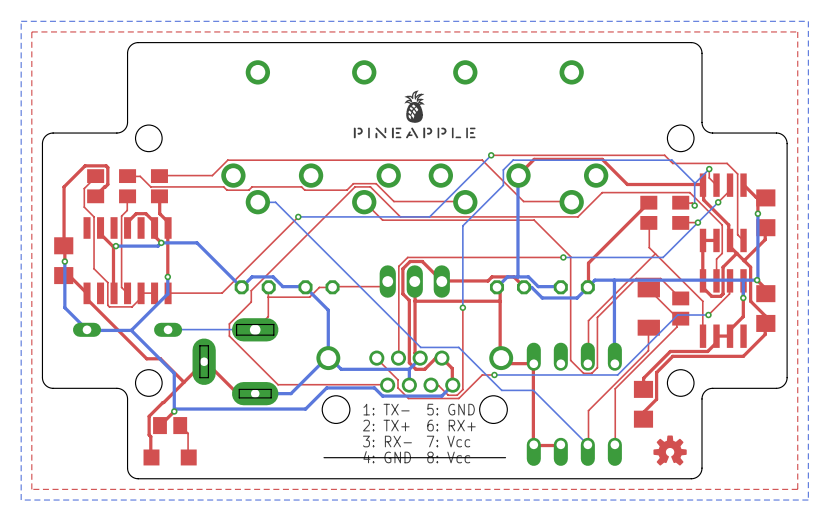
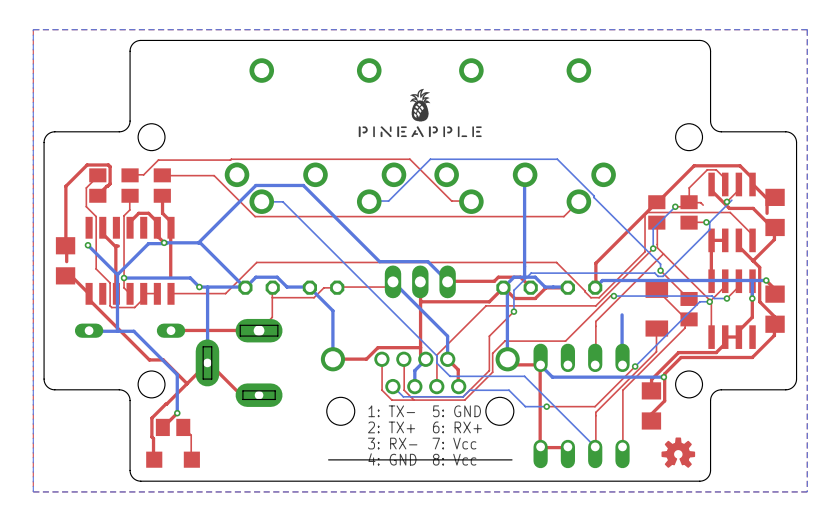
bottom zone outline: (808, 21) (21, 21) (21, 500) (808, 500) (808, 21) -> (807, 29) (807, 491) (33, 491) (33, 29) (807, 29)
top track: (491, 155) (664, 155) (672, 163) (727, 163) (737, 173) (737, 234) (743, 240) -> (256, 262) (556, 262) (590, 297) (599, 297) (645, 251) (645, 214) (647, 212) (730, 212) (752, 234) (752, 240)
bottom track: (491, 155) (429, 216) (298, 216) -> none
via: (491, 155) -> none
top track: (226, 160) (212, 175) (159, 176) -> (230, 160) (158, 160) (143, 174) (130, 175)
top track: (404, 160) (482, 160) (523, 201) (571, 202) -> (409, 159) (451, 201)
bottom track: (513, 160) (503, 169) (503, 185) (462, 225) (462, 307) -> (519, 159) (430, 159) (388, 201) (369, 201)
bottom track: (550, 160) (671, 160) (695, 183) -> (557, 159) (660, 264) (660, 270)
top track: (709, 169) (709, 178) (715, 184) -> (675, 206) (684, 206) (689, 202) (689, 187) (707, 169) (716, 169) (724, 178) (724, 183)
bottom track: (709, 169) (694, 183) (694, 205) -> none
via: (709, 169) -> none
top track: (518, 175) (534, 159) (602, 159) (627, 184) (703, 185) -> none
top track: (127, 176) (140, 176) (150, 186) (223, 186) (226, 190) (248, 190) (252, 186) (301, 186) (304, 190) (346, 190) (353, 183) (376, 183) (393, 201) (445, 201) -> none
top track: none -> (752, 184) (752, 178) (740, 165) (694, 165) (656, 202)
top track: (703, 191) (703, 199) (728, 225) (730, 240) -> (712, 191) (729, 208) (753, 208) (772, 228) (775, 227)
bottom track: none -> (731, 200) (709, 222) (709, 229) (663, 276) (658, 276) (654, 273) (531, 273) (513, 290) (513, 311)
bottom track: (275, 202) (420, 347) (458, 347) (501, 390) (533, 390) -> (279, 201) (282, 201) (436, 355) (436, 363) (450, 376) (500, 376)
top track: (364, 202) (382, 220) (534, 220) (570, 256) (570, 360) (583, 373) (591, 373) (597, 367) (597, 317) (636, 278) (660, 278) -> (660, 270) (668, 278)
bottom track: (718, 202) (663, 257) (563, 257) -> none
via position: (694, 205) -> (675, 206)
bottom track: none -> (675, 206) (653, 228) (653, 248)
bottom track: (757, 213) (757, 280) -> none
via: (757, 213) -> none
top track: (298, 216) (252, 262) -> none
via: (298, 216) -> none
top track: (400, 216) (370, 186) (355, 186) (251, 290) (251, 302) (229, 323) (229, 336) (278, 384) (387, 385) -> (405, 216) (255, 216) (214, 175) (162, 175)
top track: (556, 216) (577, 216) (602, 192) (689, 192) (722, 225) (722, 253) (716, 259) (716, 280) -> (563, 216) (578, 201)
bottom track: (163, 242) (158, 246) (115, 246) -> (166, 242) (148, 243) (117, 274)
bottom track: none -> (198, 242) (255, 185) (303, 185) (379, 261) (427, 261) (447, 281)
bottom track: none -> (87, 245) (117, 274)
via: none -> (87, 245)
via: (115, 246) -> none
top track: none -> (653, 248) (595, 305) (486, 305) (436, 355) (436, 386)
via: none -> (653, 248)
top track: (736, 253) (723, 267) (723, 293) (720, 296) (711, 296) (702, 287) (703, 280) -> none
top track: (563, 257) (407, 257) (398, 266) (398, 358) -> (404, 390) (403, 359)
via: (563, 257) -> none
bottom track: (64, 261) (64, 307) (87, 329) -> none
via: (64, 261) -> none
via: none -> (660, 270)
bottom track: none -> (117, 274) (117, 331)
bottom track: (167, 276) (167, 293) (131, 330) -> none
via: (167, 276) -> none
bottom track: none -> (124, 278) (190, 278) (199, 287) (245, 287)
via: none -> (124, 278)
bottom track: (614, 280) (614, 314) -> none
top track: none -> (725, 281) (724, 287) (709, 301)
bottom track: none -> (393, 281) (447, 336) (447, 359)
top track: (441, 281) (422, 261) (410, 261) (402, 268) (402, 293) (409, 300) (409, 362) (415, 369) (424, 369) (435, 358) (441, 358) -> none
via: none -> (199, 287)
bottom track: none -> (207, 287) (207, 362)
top track: (729, 286) (729, 293) (708, 315) -> (738, 287) (726, 298)
bottom track: none -> (503, 287) (507, 291) (507, 359)
bottom track: (587, 287) (577, 297) (542, 297) (531, 287) (524, 287) -> none
top track: (500, 289) (501, 358) -> (506, 290) (514, 298) (535, 298) (545, 287) (567, 287)
bottom track: none -> (613, 296) (712, 296) (714, 298) (726, 298)
via: none -> (613, 296)
via: none -> (726, 298)
top track: (500, 301) (483, 301) -> (503, 287) (489, 301)
via: none -> (709, 301)
top track: (462, 307) (462, 389) -> (513, 311) (489, 336) (489, 370) (468, 391)
via: (462, 307) -> none
via: none -> (513, 311)
bottom track: (708, 315) (677, 315) -> (709, 301) (699, 301) (685, 315)
via: (708, 315) -> none
top track: none -> (259, 330) (171, 330)
bottom track: (255, 329) (168, 329) -> none
top track: none -> (420, 347) (377, 347) (366, 359) (332, 359)
top track: (376, 358) (398, 379) (398, 388) -> (382, 359) (382, 390) (391, 400) (414, 400)
bottom track: none -> (540, 364) (552, 377) (663, 377)
top track: none -> (635, 366) (595, 406) (546, 406)
bottom track: (627, 365) (617, 374) (517, 374) -> (540, 391) (524, 376)
via: none -> (635, 366)
bottom track: (409, 369) (341, 369) (329, 357) (326, 357) (291, 393) (255, 393) -> none
top track: (494, 374) (482, 374) -> (613, 296) (610, 296) (565, 341) (504, 341) (492, 353) (492, 372) (488, 376)
via: (494, 374) -> none
via: none -> (663, 377)
bottom track: none -> (392, 386) (403, 396) (463, 396) (469, 390) (509, 390) (525, 406) (546, 406)
top track: (431, 385) (438, 385) (448, 395) -> (410, 396) (454, 396)
bottom track: (452, 385) (441, 396) (382, 396) (374, 387) (326, 387) (305, 409) (175, 409) (174, 411) -> none
via: none -> (546, 406)

